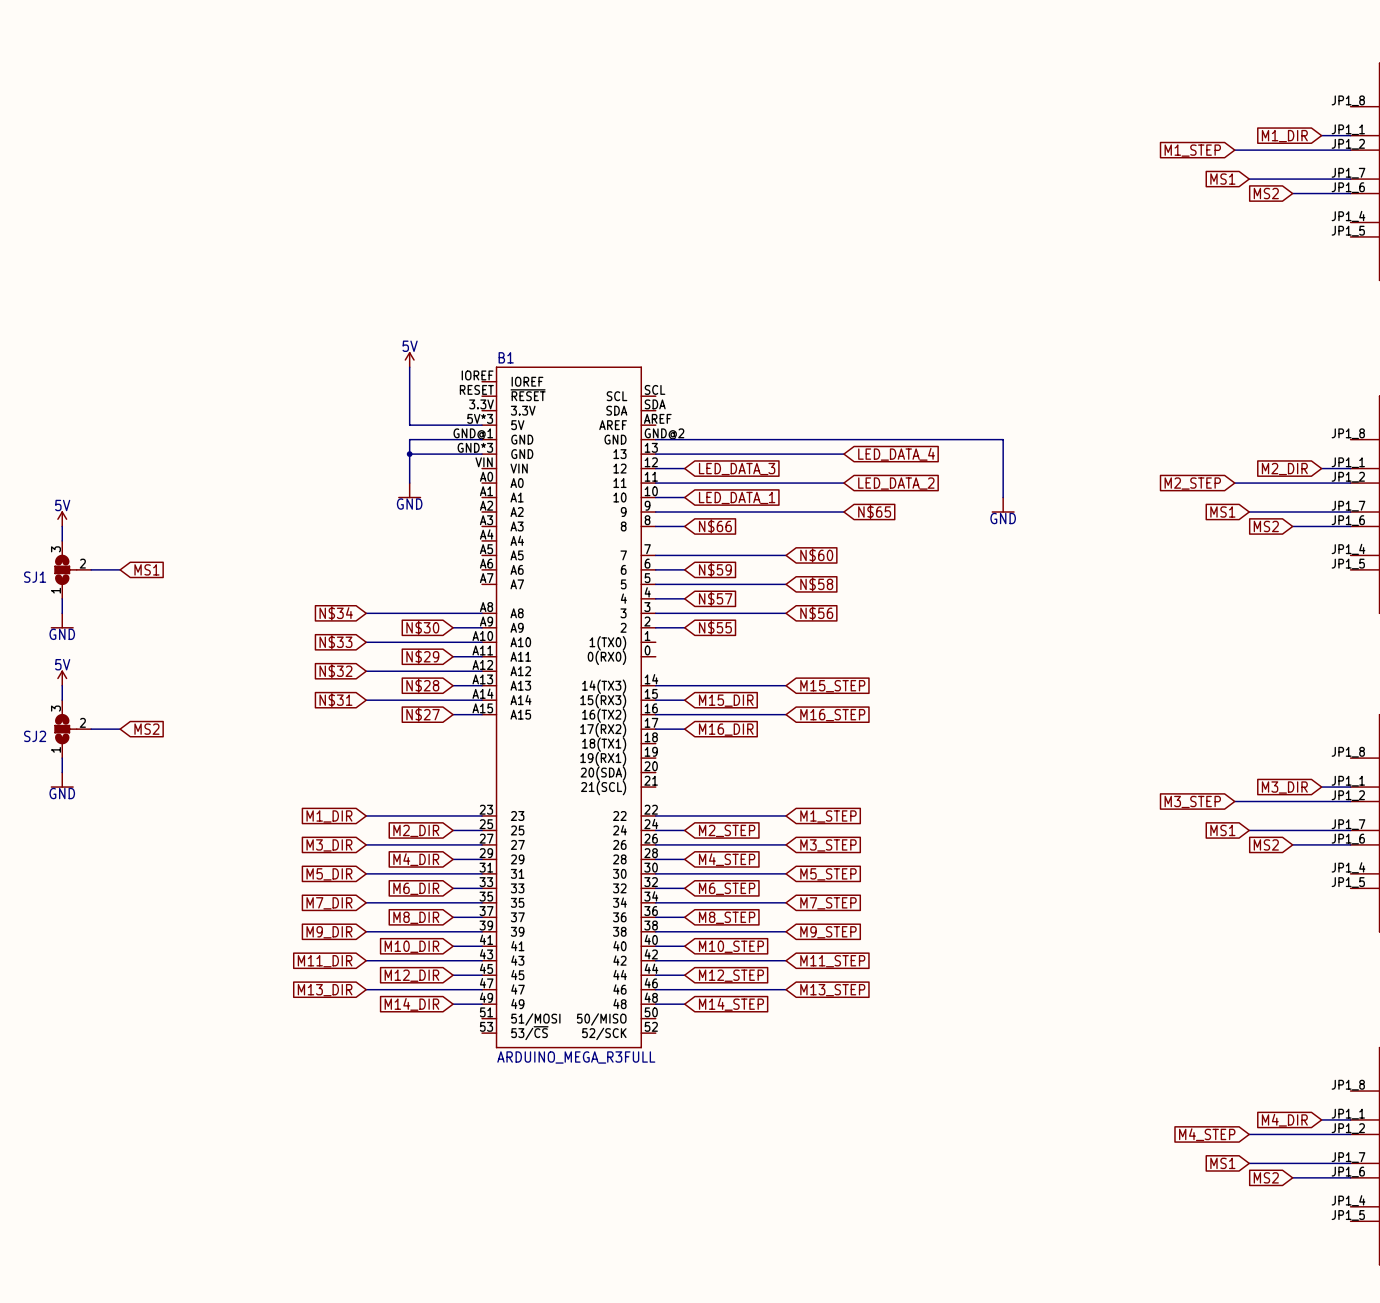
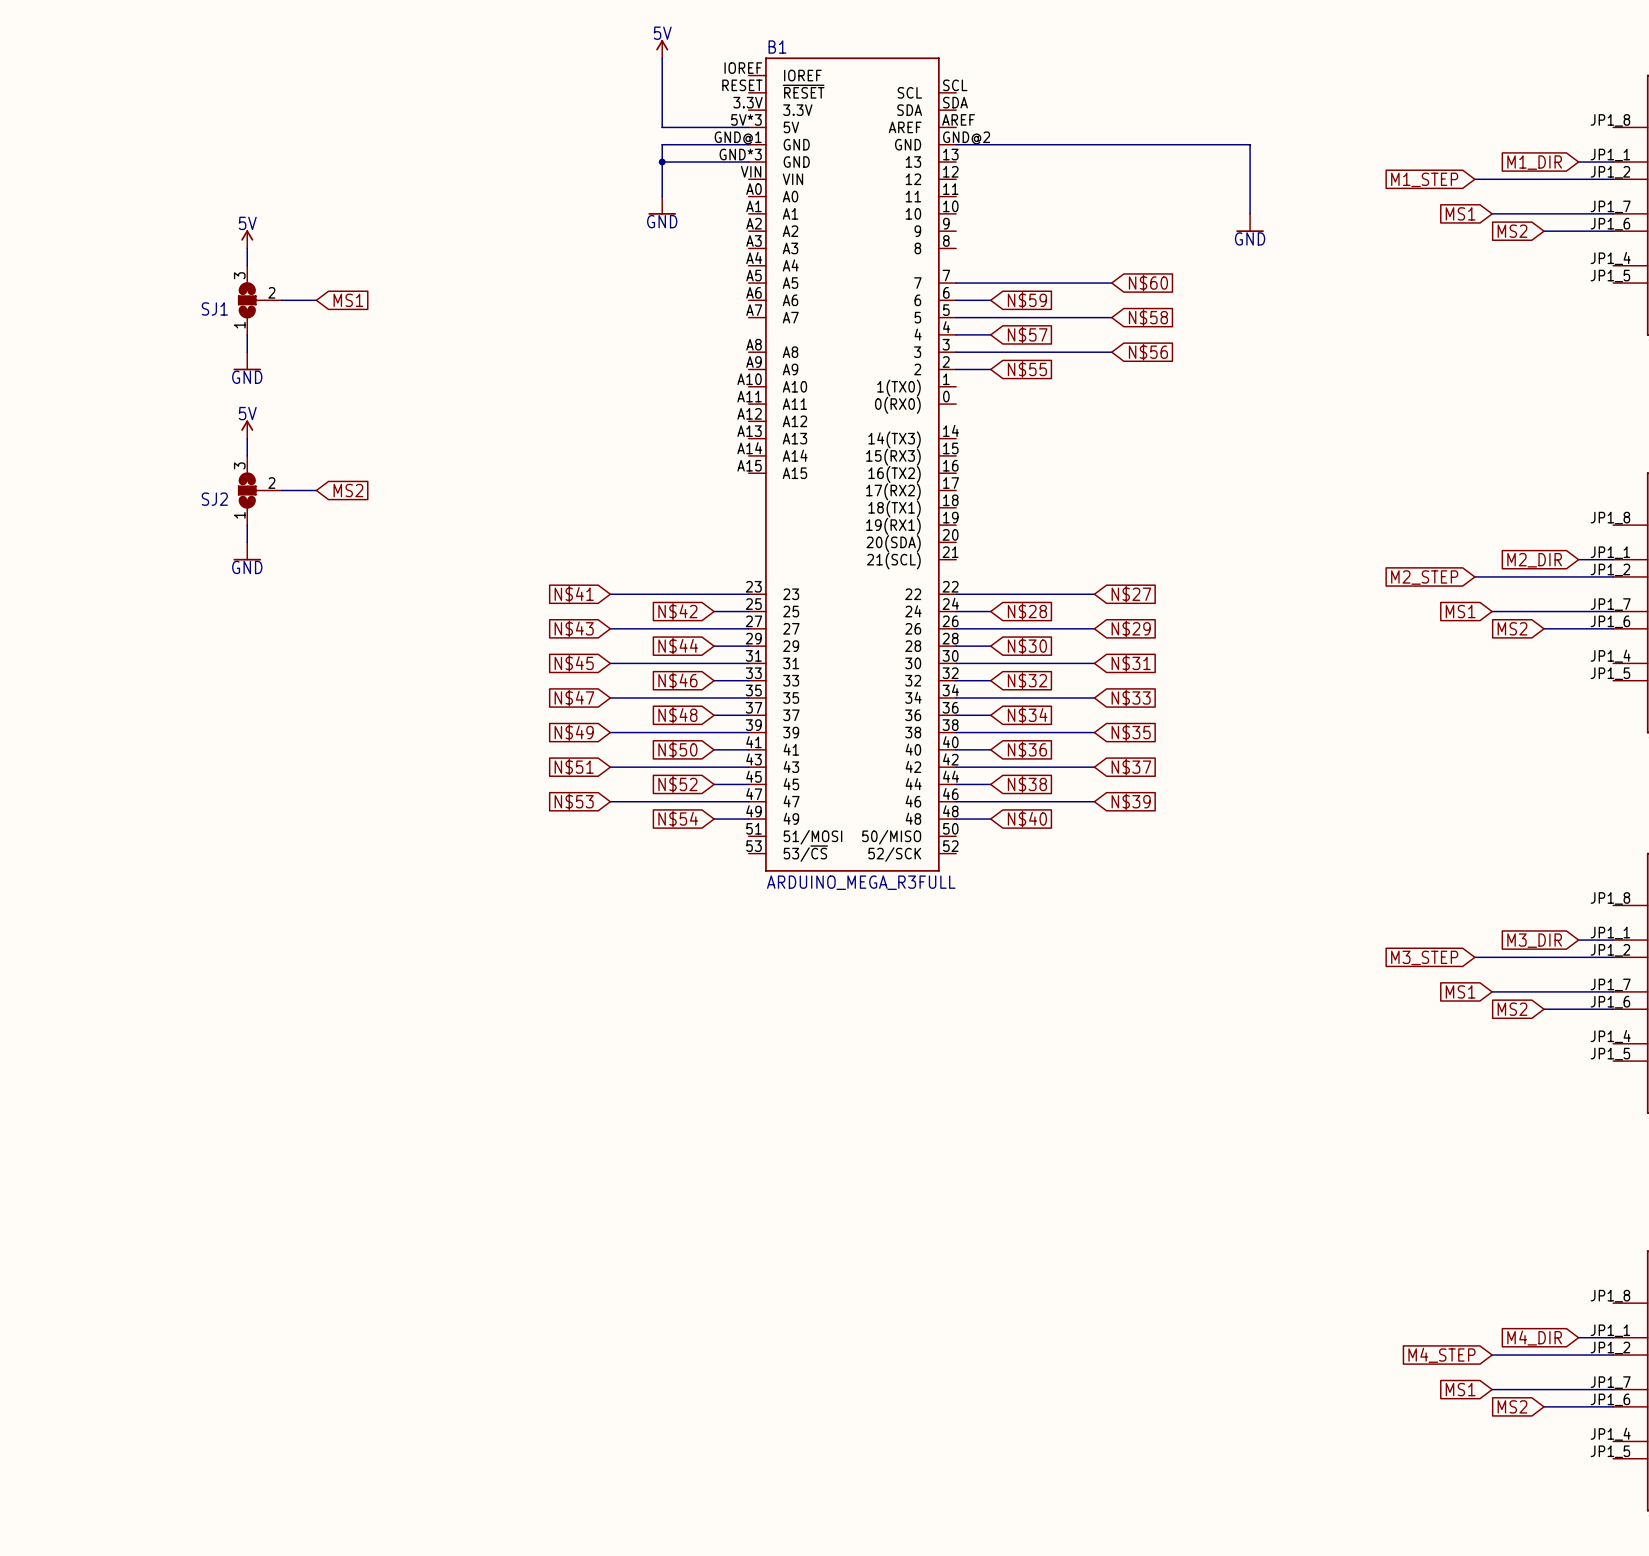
power symbol: none -> 5V (662, 49)
wire: none -> (662, 58) (662, 127) (748, 127)
wire: none -> (748, 144) (662, 144) (662, 196)
wire: none -> (956, 144) (1250, 144) (1250, 213)
wire: none -> (662, 162) (748, 162)
junction: none -> (662, 162)
power symbol: none -> GND (662, 205)
power symbol: none -> GND (1250, 222)
power symbol: none -> 5V (247, 239)
wire: none -> (247, 248) (247, 265)
wire: none -> (956, 283) (1111, 283)
global label: none -> N$60 (1148, 283)
wire: none -> (281, 300) (316, 300)
global label: none -> MS1 (348, 300)
wire: none -> (956, 300) (990, 300)
global label: none -> N$59 (1027, 300)
wire: none -> (956, 317) (1111, 317)
global label: none -> N$58 (1148, 317)
wire: none -> (247, 334) (247, 352)
wire: none -> (956, 334) (990, 334)
global label: none -> N$57 (1027, 334)
wire: none -> (956, 352) (1111, 352)
global label: none -> N$56 (1148, 352)
power symbol: none -> GND (247, 361)
wire: none -> (956, 369) (990, 369)
global label: none -> N$55 (1027, 369)
power symbol: none -> 5V (247, 429)
power symbol: 5V (409, 359) -> none
wire: none -> (247, 438) (247, 455)
wire: (409, 367) (409, 425) (482, 425) -> none
wire: none -> (281, 490) (316, 490)
global label: none -> MS2 (348, 490)
wire: none -> (247, 525) (247, 542)
wire: (482, 439) (409, 439) (409, 483) -> none
wire: (655, 439) (1003, 439) (1003, 497) -> none
wire: (409, 454) (482, 454) -> none
junction: (409, 454) -> none
wire: (655, 454) (843, 454) -> none
global label: LED_DATA_4 (896, 454) -> none
power symbol: none -> GND (247, 551)
wire: (655, 468) (684, 468) -> (714, 611) (748, 611)
global label: LED_DATA_3 (737, 469) -> none
wire: (655, 483) (843, 483) -> none
global label: LED_DATA_2 (896, 483) -> none
power symbol: GND (409, 490) -> none
global label: none -> N$41 (574, 594)
wire: none -> (610, 594) (748, 594)
wire: (655, 497) (684, 497) -> (714, 646) (748, 646)
wire: none -> (956, 594) (1094, 594)
global label: none -> N$27 (1131, 594)
global label: LED_DATA_1 (737, 498) -> none
power symbol: GND (1003, 505) -> none
global label: none -> N$42 (677, 611)
wire: (655, 512) (800, 512) -> none
wire: (829, 512) (843, 512) -> none
global label: none -> N$28 (1027, 611)
global label: N$65 (874, 512) -> none
power symbol: 5V (62, 518) -> none
wire: (62, 526) (62, 540) -> none
global label: none -> N$43 (574, 628)
wire: none -> (610, 628) (748, 628)
wire: (655, 526) (684, 526) -> none
global label: N$66 (715, 526) -> none
wire: none -> (956, 628) (1094, 628)
global label: none -> N$29 (1131, 628)
global label: none -> N$44 (678, 646)
wire: none -> (956, 646) (990, 646)
global label: none -> N$45 (574, 663)
wire: none -> (610, 663) (748, 663)
wire: (655, 555) (786, 555) -> none
wire: none -> (956, 663) (1094, 663)
global label: N$60 (816, 555) -> N$30 (1027, 646)
global label: none -> N$31 (1131, 663)
SJ1 position: (72, 569) -> (259, 300)
wire: (91, 569) (120, 569) -> none
global label: MS1 (146, 569) -> none
global label: none -> N$46 (677, 680)
wire: (655, 569) (684, 569) -> (714, 680) (748, 680)
global label: N$59 (715, 569) -> none
wire: none -> (956, 680) (990, 680)
global label: none -> N$32 (1027, 680)
global label: none -> N$47 (574, 697)
wire: none -> (610, 697) (748, 697)
wire: (655, 584) (786, 584) -> none
wire: none -> (956, 697) (1094, 697)
global label: N$58 (816, 584) -> none
global label: none -> N$33 (1131, 697)
wire: (62, 598) (62, 613) -> none
global label: none -> N$48 (677, 715)
wire: (655, 598) (684, 598) -> (714, 715) (748, 715)
global label: N$57 (715, 598) -> none
wire: none -> (956, 715) (990, 715)
global label: none -> N$34 (1027, 715)
global label: N$34 (336, 613) -> none
wire: (366, 613) (482, 613) -> none
global label: none -> N$49 (574, 732)
wire: none -> (610, 732) (748, 732)
wire: (655, 613) (786, 613) -> none
wire: none -> (956, 732) (1094, 732)
global label: N$56 (816, 613) -> N$36 (1027, 749)
global label: none -> N$35 (1131, 732)
power symbol: GND (62, 620) -> none
global label: N$30 (422, 627) -> none
wire: (453, 627) (482, 627) -> none
global label: none -> N$50 (677, 749)
wire: (655, 627) (684, 627) -> (714, 749) (748, 749)
global label: N$55 (715, 627) -> none
wire: none -> (956, 749) (990, 749)
global label: N$33 (335, 642) -> none
wire: (366, 642) (482, 642) -> none
global label: none -> N$51 (574, 767)
wire: none -> (610, 767) (748, 767)
wire: none -> (956, 767) (1094, 767)
global label: none -> N$37 (1131, 767)
global label: N$29 (422, 656) -> none
wire: (453, 656) (482, 656) -> none
global label: none -> N$52 (677, 784)
wire: none -> (956, 784) (990, 784)
global label: none -> N$38 (1027, 784)
global label: N$32 (335, 671) -> none
wire: (366, 671) (482, 671) -> none
global label: none -> N$53 (574, 801)
wire: none -> (610, 801) (748, 801)
wire: none -> (956, 801) (1094, 801)
global label: none -> N$39 (1131, 801)
power symbol: 5V (62, 678) -> none
wire: (62, 685) (62, 700) -> none
global label: N$28 (422, 685) -> none
wire: (453, 685) (482, 685) -> none
global label: none -> N$54 (678, 819)
wire: (655, 685) (786, 685) -> none
wire: none -> (956, 819) (990, 819)
global label: none -> N$40 (1027, 819)
global label: M15_STEP (832, 686) -> none
global label: N$31 (335, 700) -> none
wire: (366, 700) (482, 700) -> none
wire: (655, 700) (684, 700) -> (714, 819) (748, 819)
global label: M15_DIR (726, 700) -> none
B1 position: (568, 707) -> (852, 464)
global label: N$27 (423, 714) -> none
wire: (453, 714) (482, 714) -> none
wire: (655, 714) (786, 714) -> none
global label: M16_STEP (832, 715) -> none
SJ2 position: (72, 729) -> (259, 490)
wire: (91, 729) (120, 729) -> none
global label: MS2 (146, 729) -> none
global label: M16_DIR (726, 729) -> none
wire: (62, 758) (62, 772) -> none
power symbol: GND (62, 780) -> none
wire: (366, 815) (482, 815) -> none
wire: (655, 815) (786, 815) -> none
global label: M1_DIR (329, 816) -> none
global label: M1_STEP (828, 816) -> none
global label: M2_DIR (416, 830) -> none
wire: (453, 830) (482, 830) -> none
wire: (655, 830) (684, 830) -> none
global label: M2_STEP (727, 830) -> none
wire: (366, 844) (482, 844) -> none
wire: (655, 844) (786, 844) -> none
global label: M3_DIR (329, 845) -> none
global label: M3_STEP (828, 845) -> none
global label: M4_DIR (416, 859) -> none
wire: (453, 859) (482, 859) -> none
wire: (655, 859) (684, 859) -> none
global label: M4_STEP (727, 859) -> none
wire: (366, 873) (482, 873) -> none
wire: (655, 873) (786, 873) -> none
global label: M5_DIR (329, 874) -> none
global label: M5_STEP (828, 874) -> none
global label: M6_DIR (416, 888) -> none
wire: (453, 888) (482, 888) -> none
wire: (655, 888) (684, 888) -> none
global label: M6_STEP (727, 888) -> none
wire: (366, 902) (482, 902) -> none
wire: (655, 902) (786, 902) -> none
global label: M7_DIR (329, 903) -> none
global label: M7_STEP (828, 903) -> none
global label: M8_DIR (416, 917) -> none
wire: (453, 917) (482, 917) -> none
wire: (655, 917) (684, 917) -> none
global label: M8_STEP (727, 917) -> none
wire: (366, 931) (482, 931) -> none
wire: (655, 931) (786, 931) -> none
global label: M9_DIR (329, 932) -> none
global label: M9_STEP (828, 932) -> none
global label: M10_DIR (411, 946) -> none
wire: (453, 946) (482, 946) -> none
wire: (655, 946) (684, 946) -> none
global label: M10_STEP (731, 946) -> none
wire: (366, 960) (482, 960) -> none
wire: (655, 960) (786, 960) -> none
global label: M11_DIR (325, 961) -> none
global label: M11_STEP (832, 961) -> none
global label: M12_DIR (411, 975) -> none
wire: (453, 975) (482, 975) -> none
wire: (655, 975) (684, 975) -> none
global label: M12_STEP (731, 975) -> none
wire: (366, 989) (482, 989) -> none
wire: (655, 989) (786, 989) -> none
global label: M13_DIR (325, 990) -> none
global label: M13_STEP (832, 990) -> none
global label: M14_DIR (411, 1004) -> none
wire: (453, 1004) (482, 1004) -> none
wire: (655, 1004) (684, 1004) -> none
global label: M14_STEP (731, 1004) -> none

